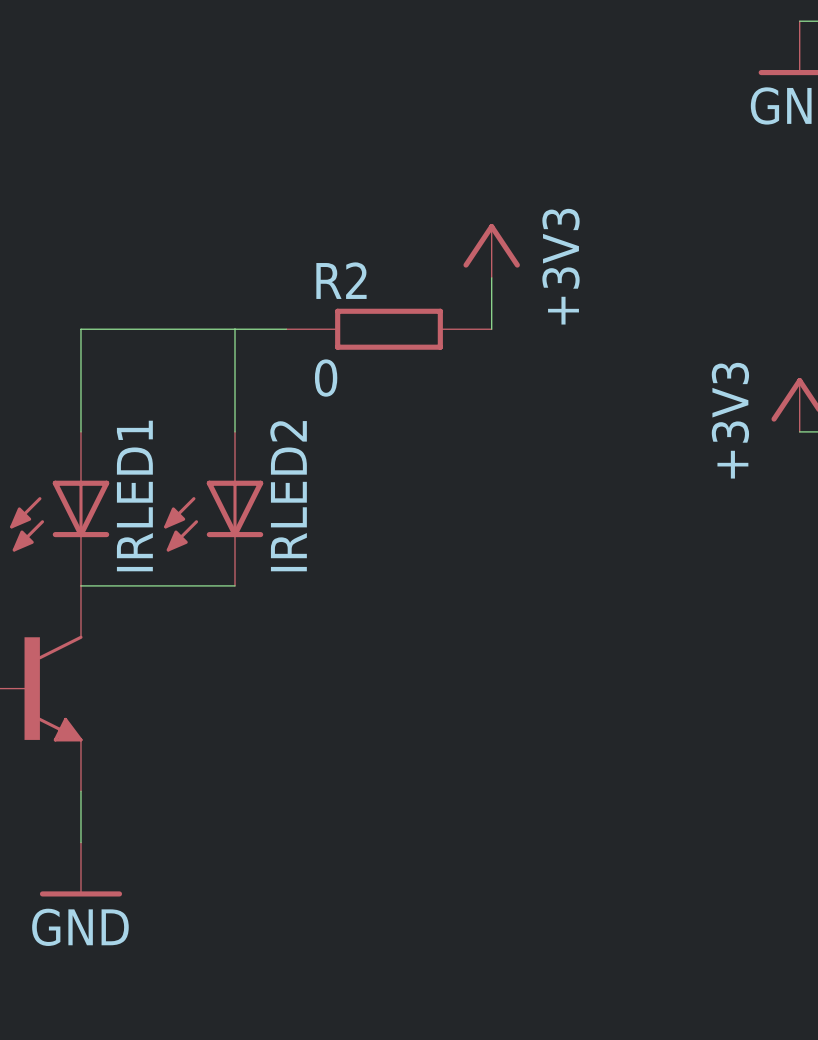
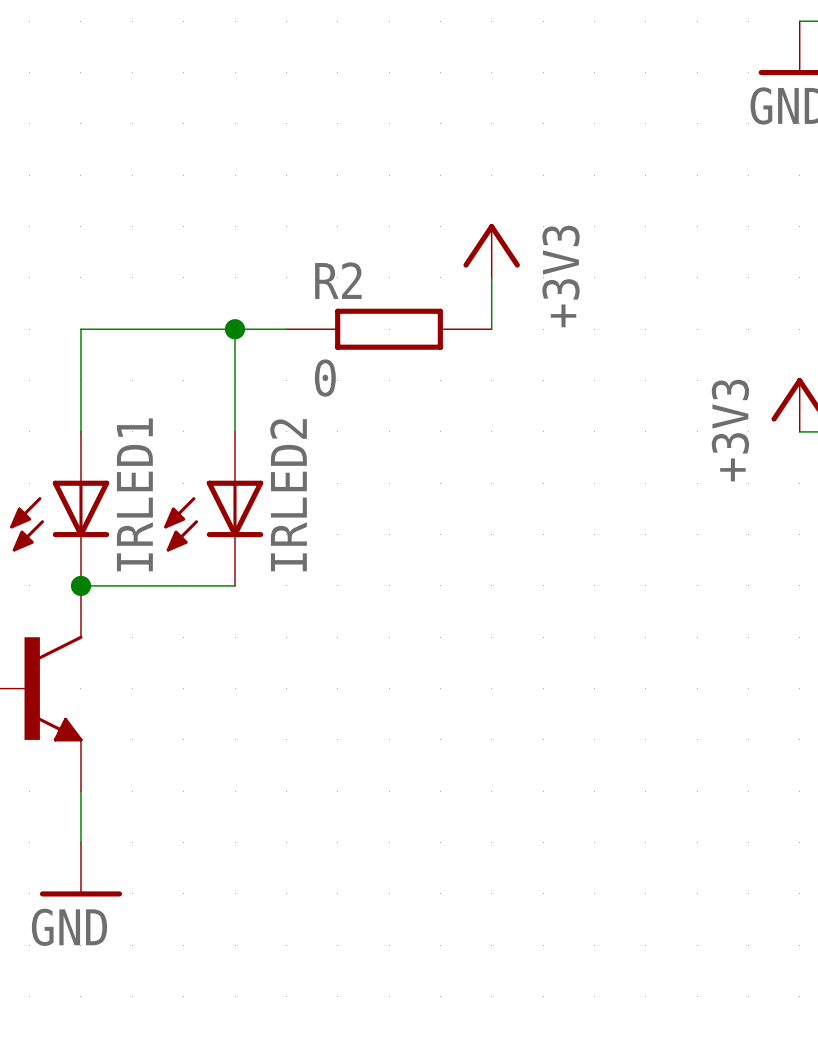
junction: none -> (235, 329)
junction: none -> (80, 585)

